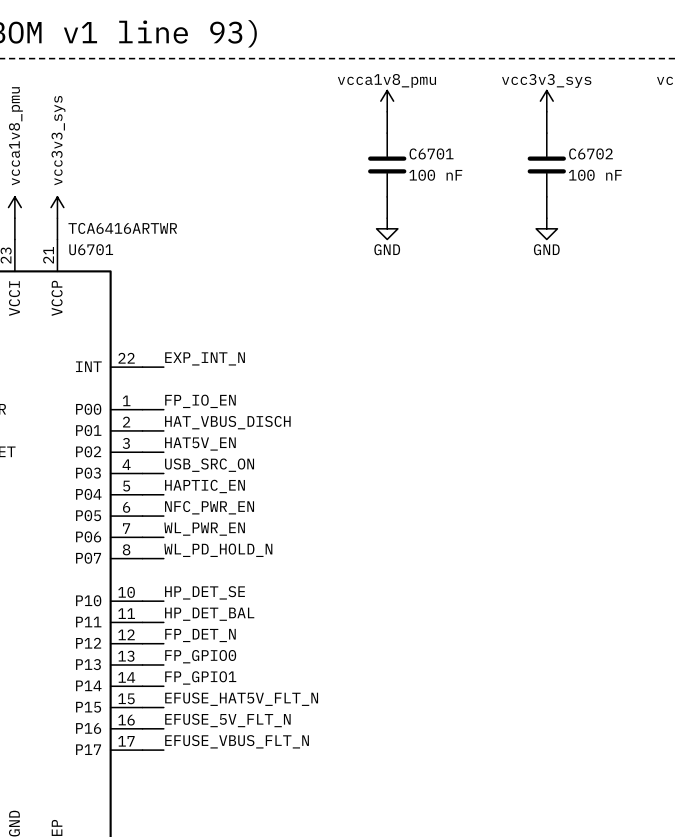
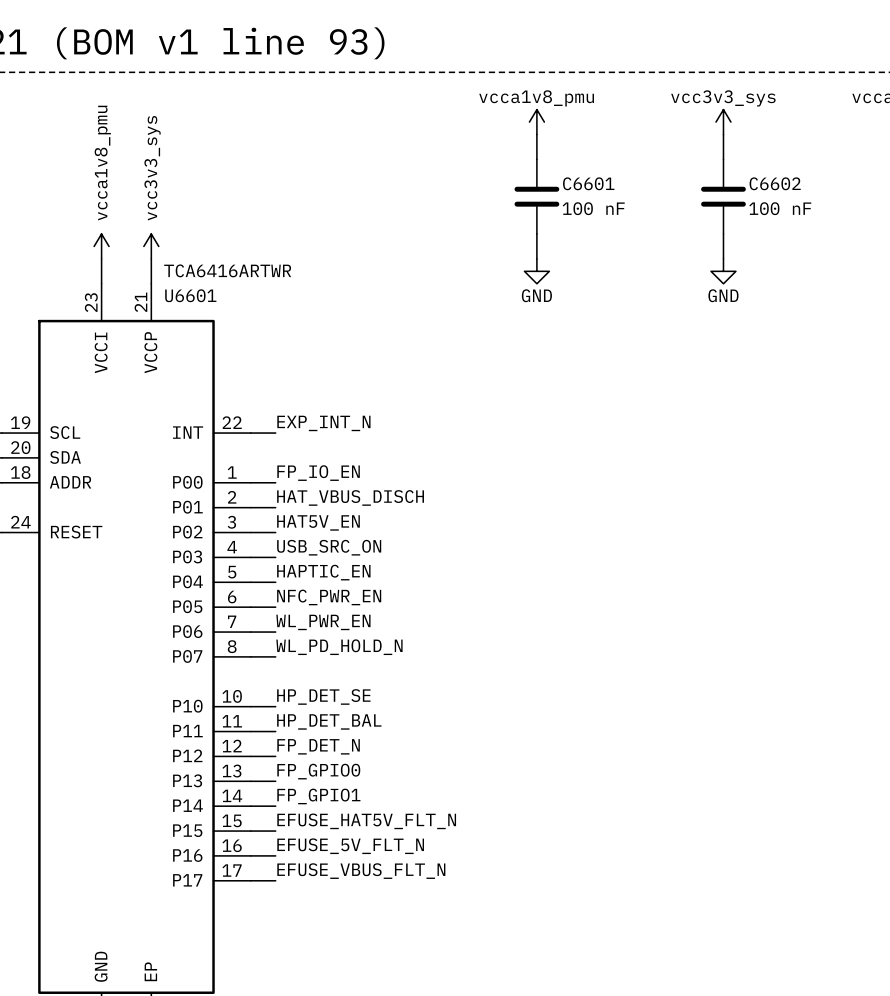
C6701 name: C6701 (431, 153) -> C6601 (588, 183)
C6702 name: C6702 (590, 153) -> C6602 (775, 183)
U6701 name: U6701 (91, 249) -> U6601 (190, 295)

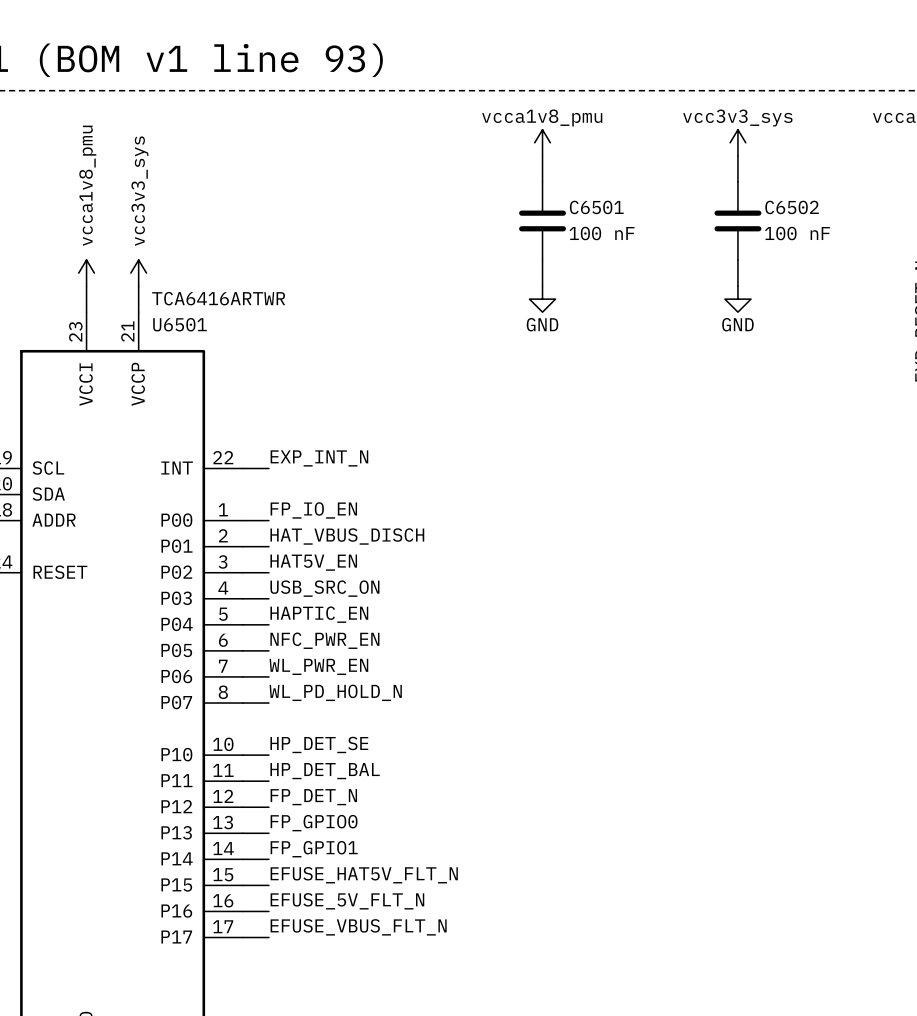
C6601 name: C6601 (588, 183) -> C6501 (596, 207)
C6602 name: C6602 (775, 183) -> C6502 (792, 207)
U6601 name: U6601 (190, 295) -> U6501 (179, 324)

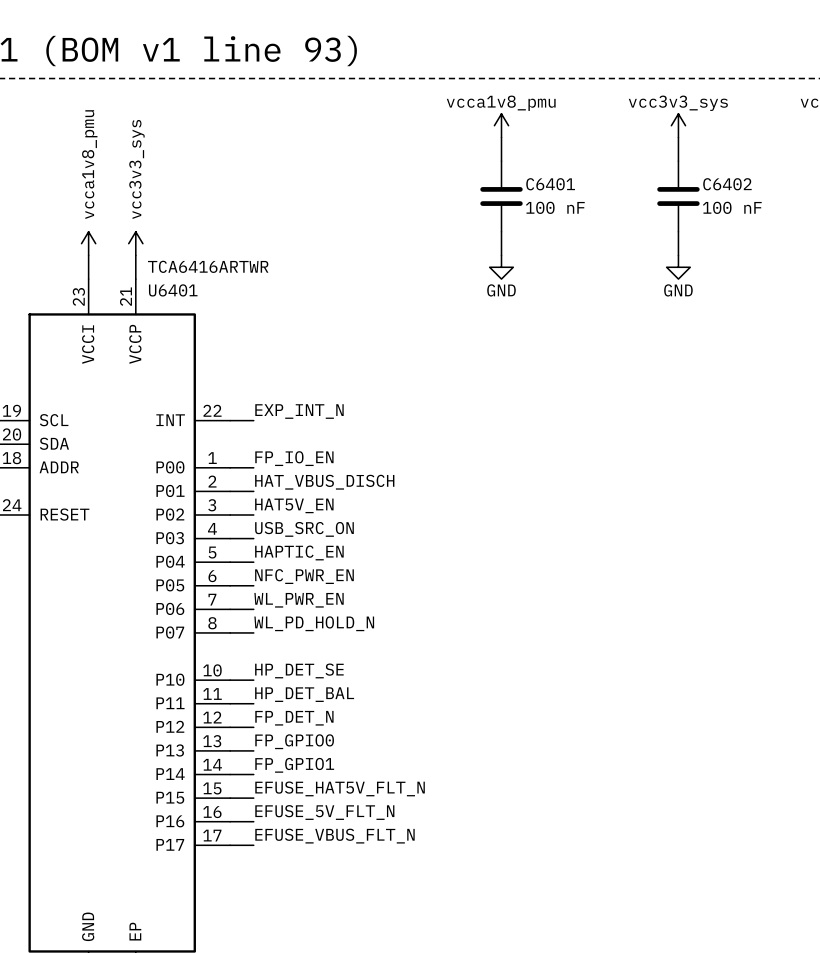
C6501 name: C6501 (596, 207) -> C6401 (550, 184)
C6502 name: C6502 (792, 207) -> C6402 (727, 184)
U6501 name: U6501 (179, 324) -> U6401 (173, 290)

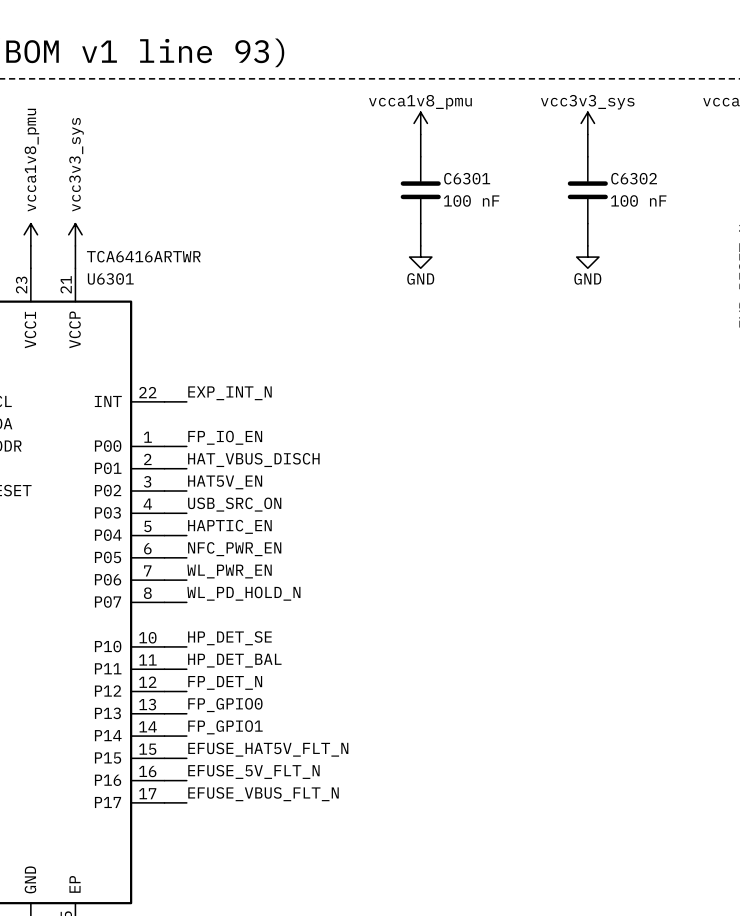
C6401 name: C6401 (550, 184) -> C6301 (467, 178)
C6402 name: C6402 (727, 184) -> C6302 (634, 178)
U6401 name: U6401 (173, 290) -> U6301 (110, 278)

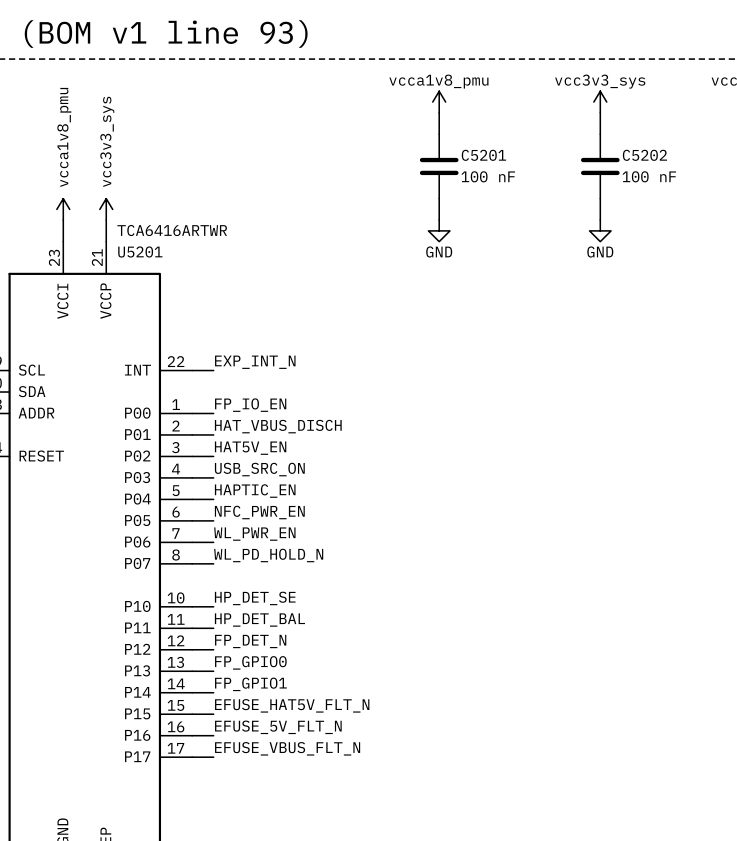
C6301 name: C6301 (467, 178) -> C5201 (483, 155)
C6302 name: C6302 (634, 178) -> C5202 (644, 155)
U6301 name: U6301 (110, 278) -> U5201 (140, 251)

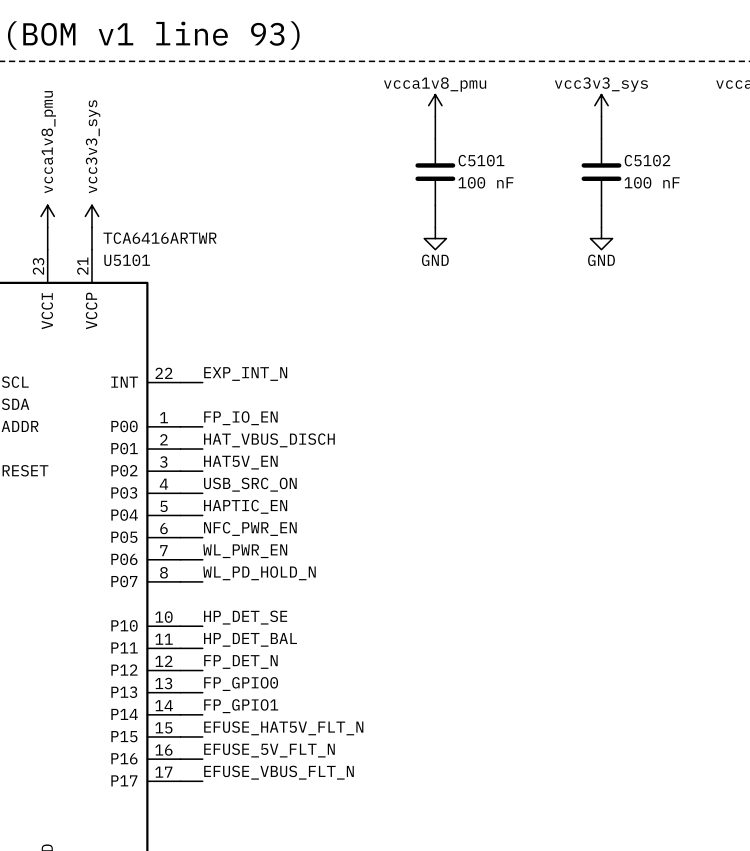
C5201 name: C5201 (483, 155) -> C5101 (481, 160)
C5202 name: C5202 (644, 155) -> C5102 (647, 160)
U5201 name: U5201 (140, 251) -> U5101 (127, 260)

